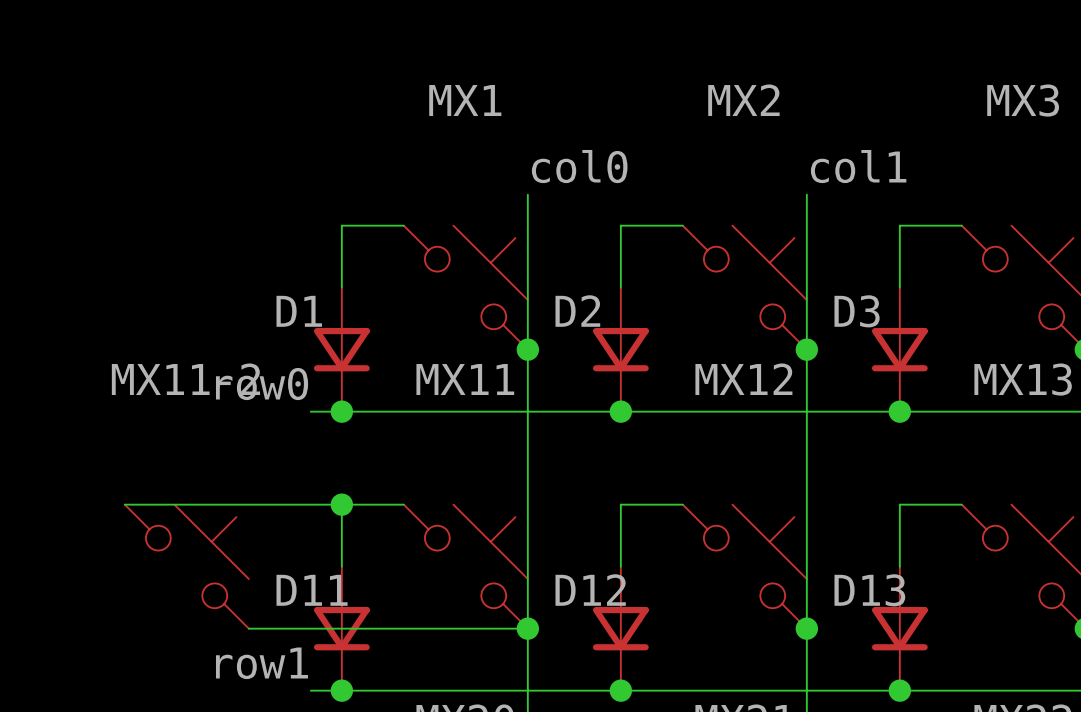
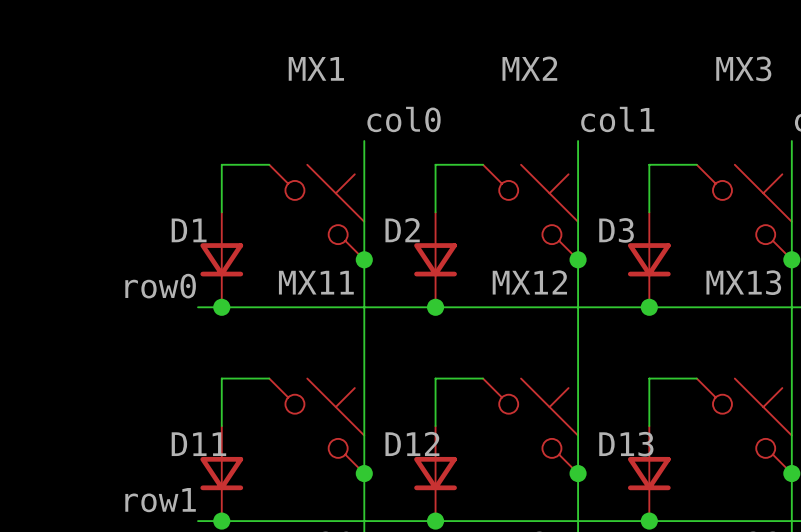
wire: (124, 504) (341, 504) -> none
junction: (341, 504) -> none
MX11-2: (186, 566) -> none
wire: (248, 628) (527, 628) -> none

